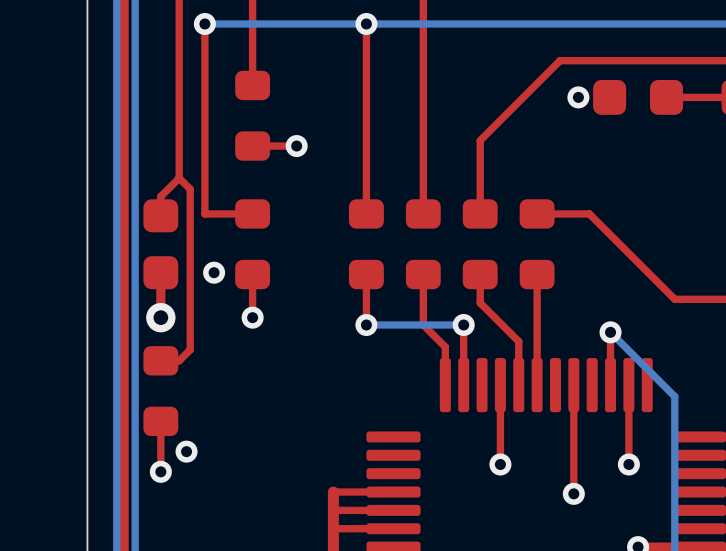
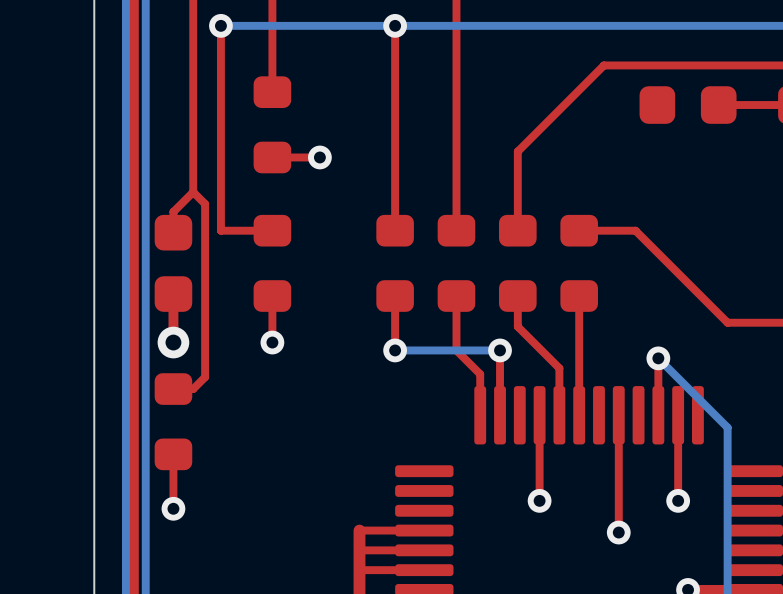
via: (578, 97) -> none
via: (214, 272) -> none
via: (186, 451) -> none

